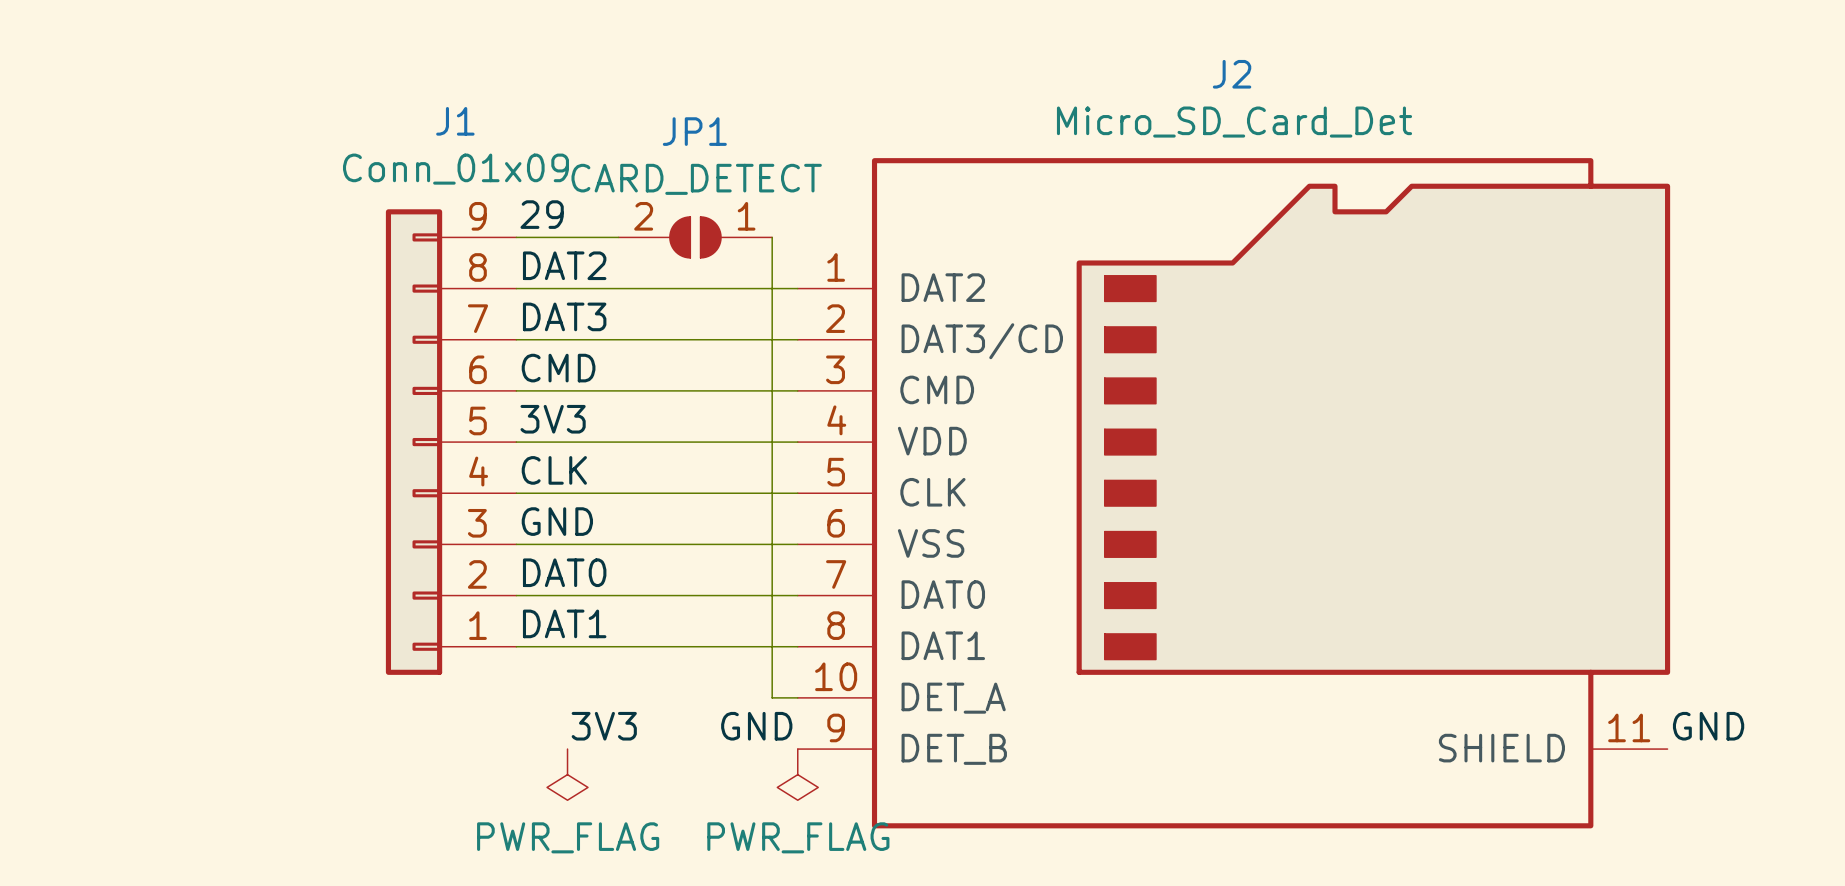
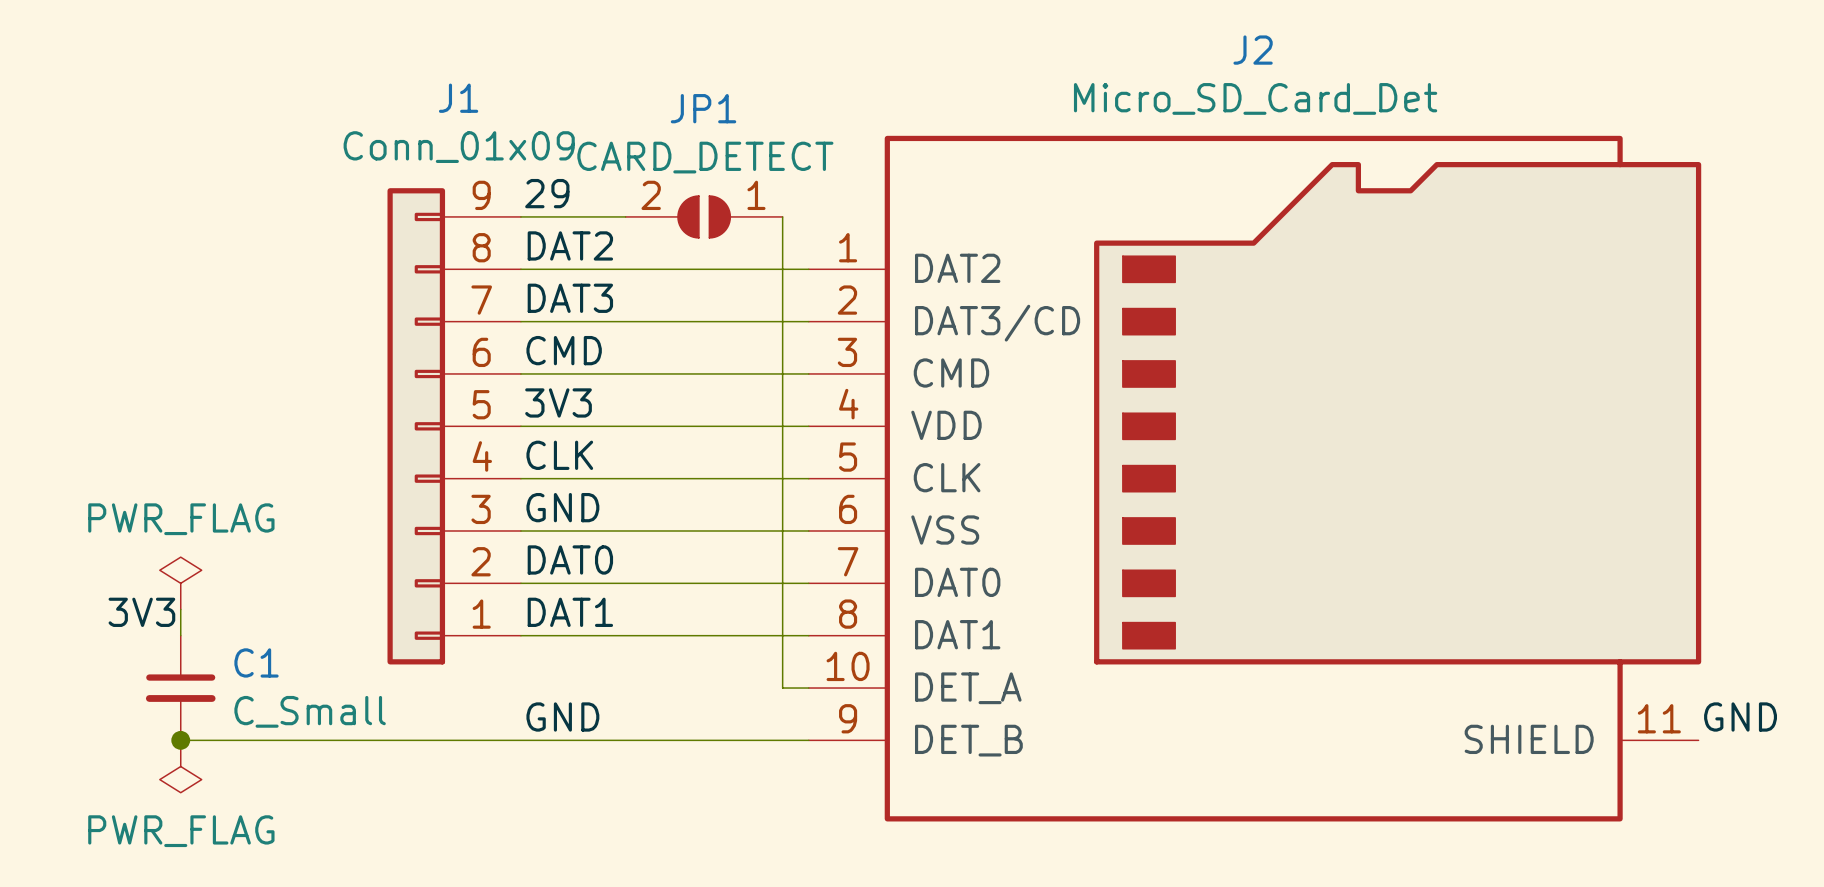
power symbol: none -> PWR_FLAG (180, 583)
wire: none -> (180, 609) (180, 635)
C1: none -> C_Small (180, 688)
label position: 3V3 (604, 726) -> 3V3 (141, 612)
label position: GND (756, 726) -> GND (562, 717)
wire: none -> (180, 740) (808, 740)
junction: none -> (180, 740)
power symbol: none -> PWR_FLAG (180, 766)
power symbol: PWR_FLAG (567, 774) -> none
power symbol: PWR_FLAG (797, 774) -> none

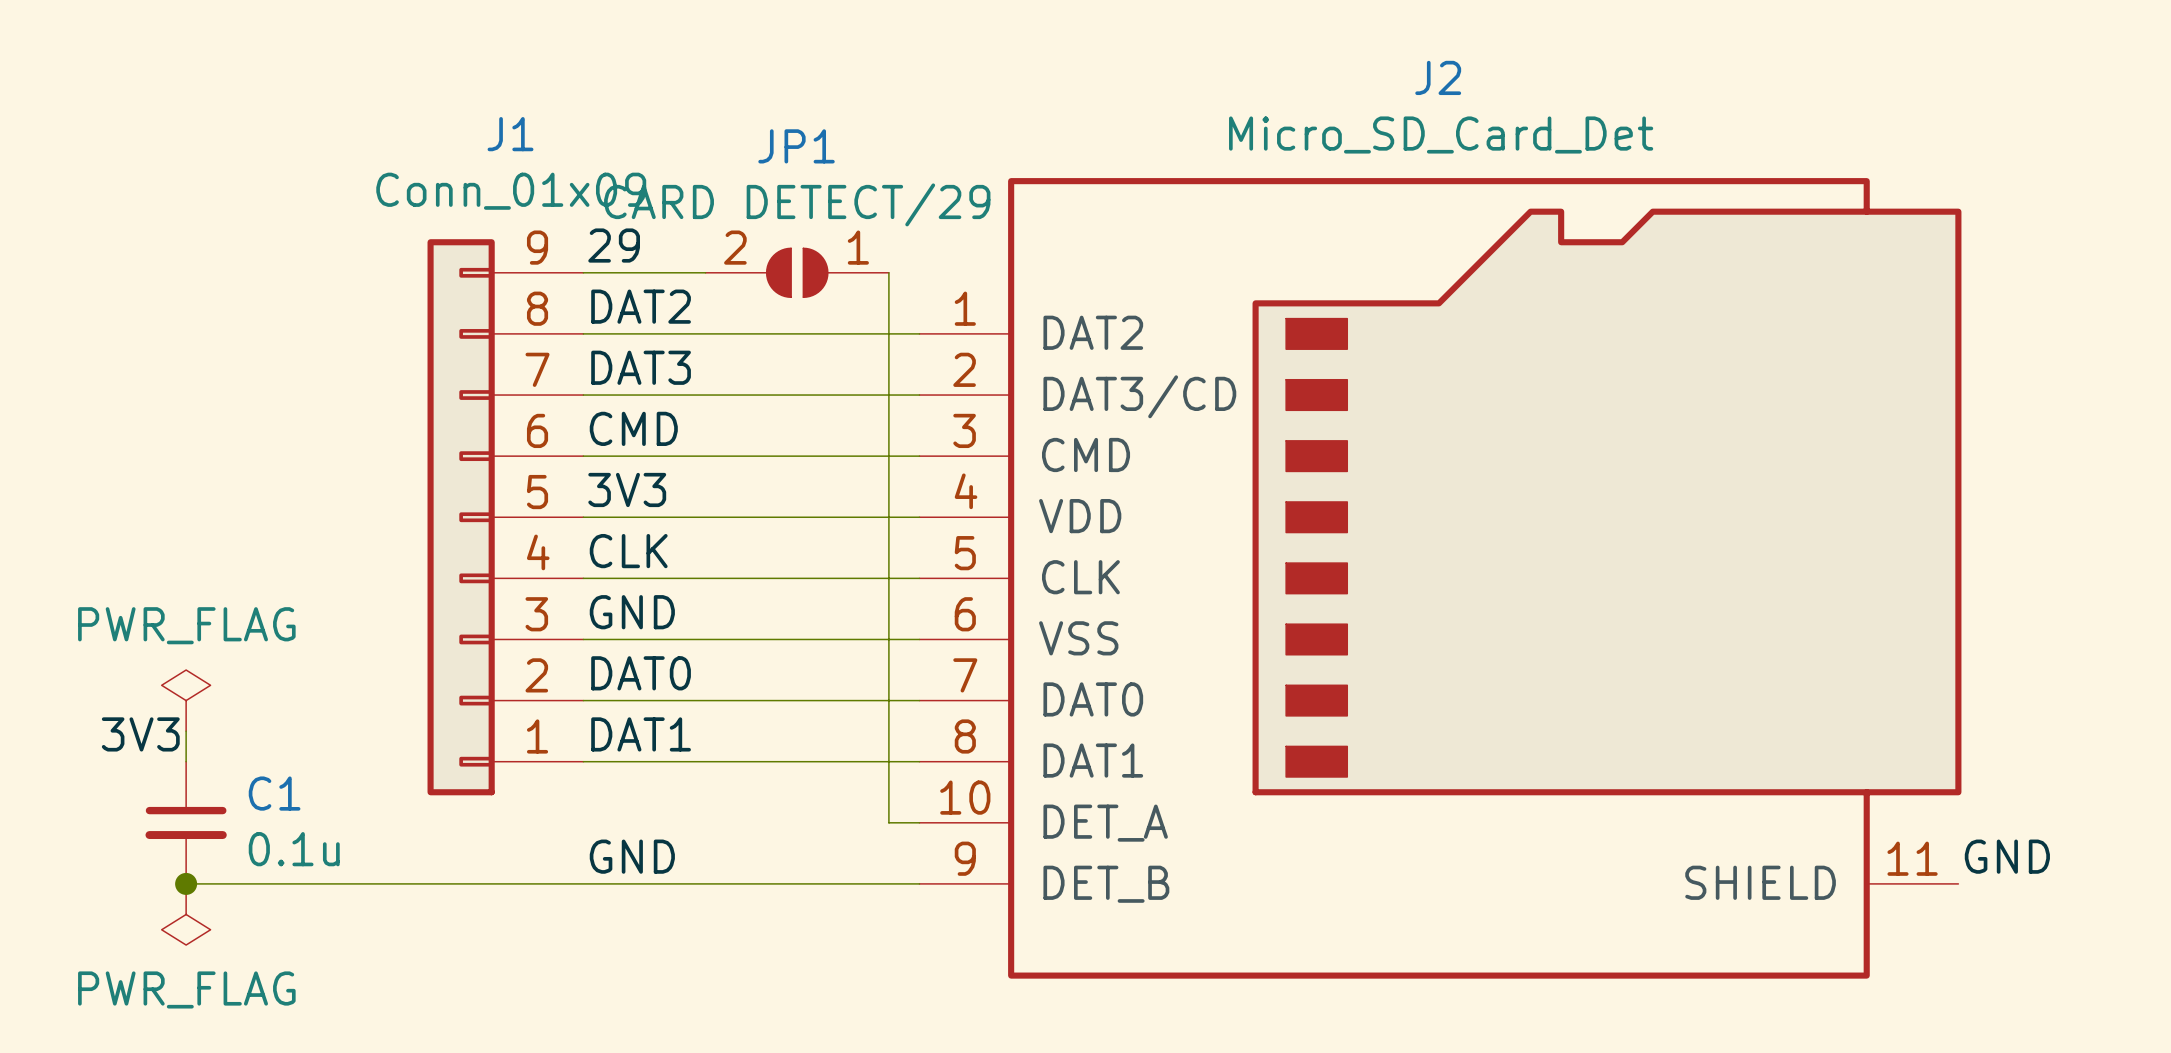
JP1 value: CARD_DETECT (705, 157) -> CARD DETECT/29 (797, 204)
C1 value: C_Small (310, 711) -> 0.1u (294, 849)

